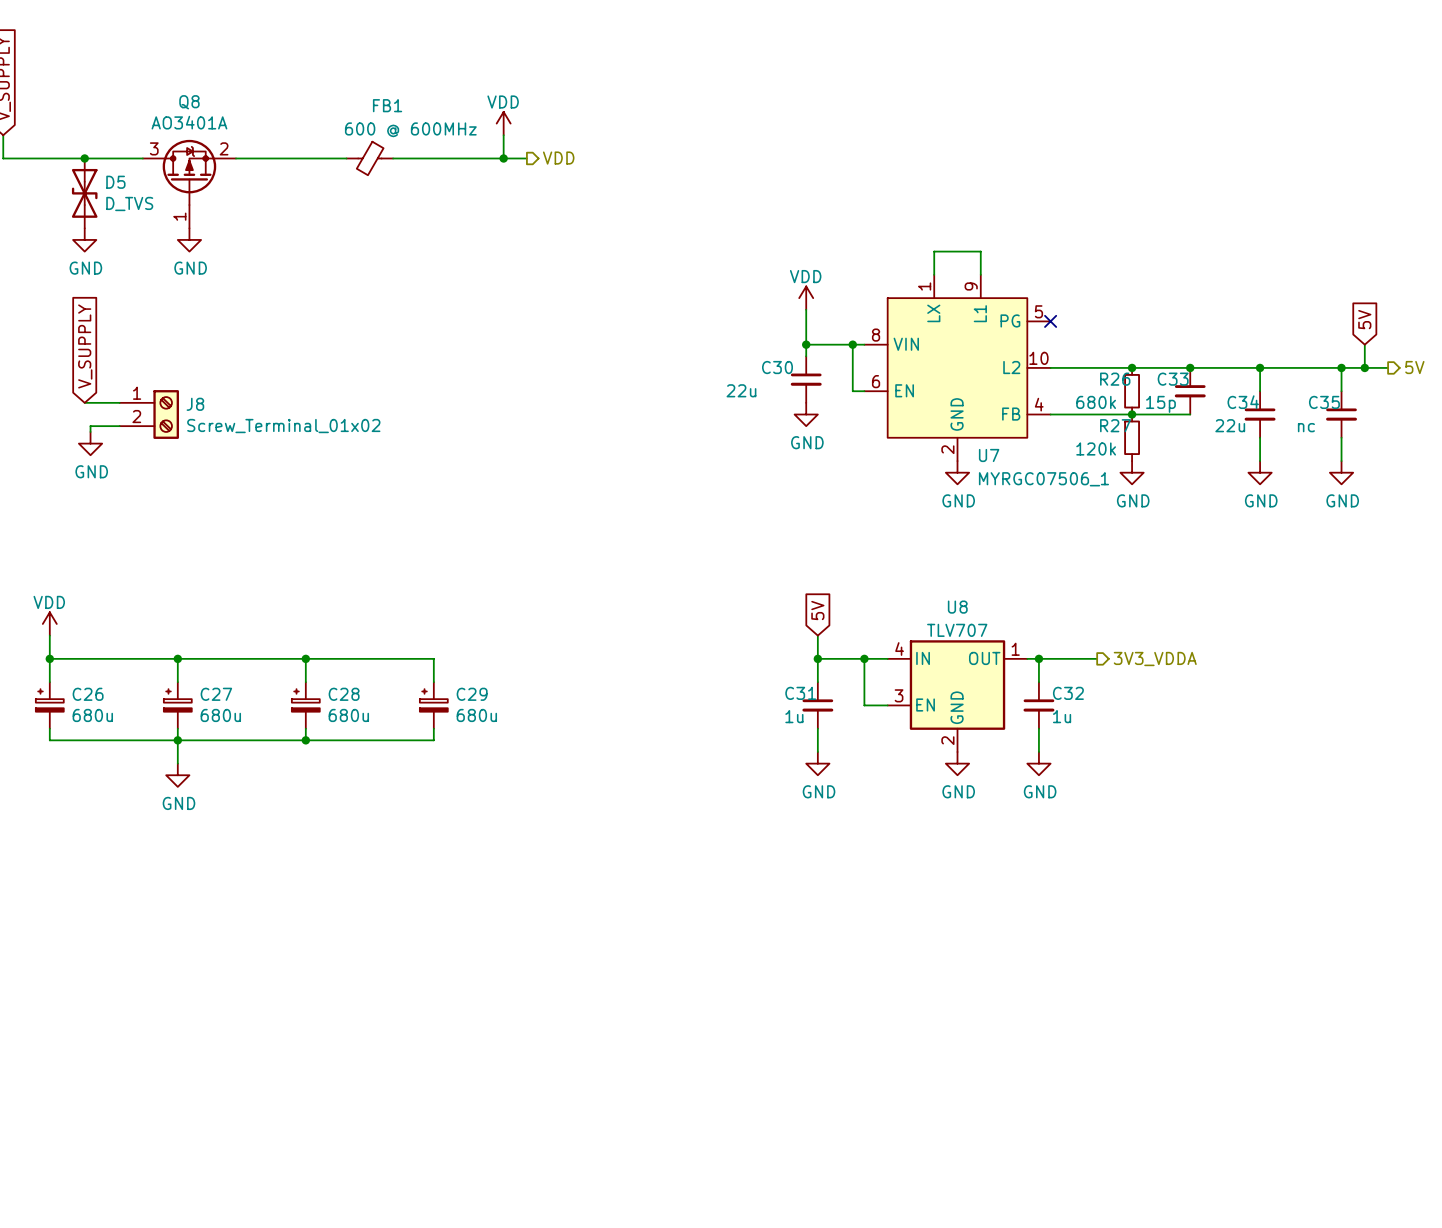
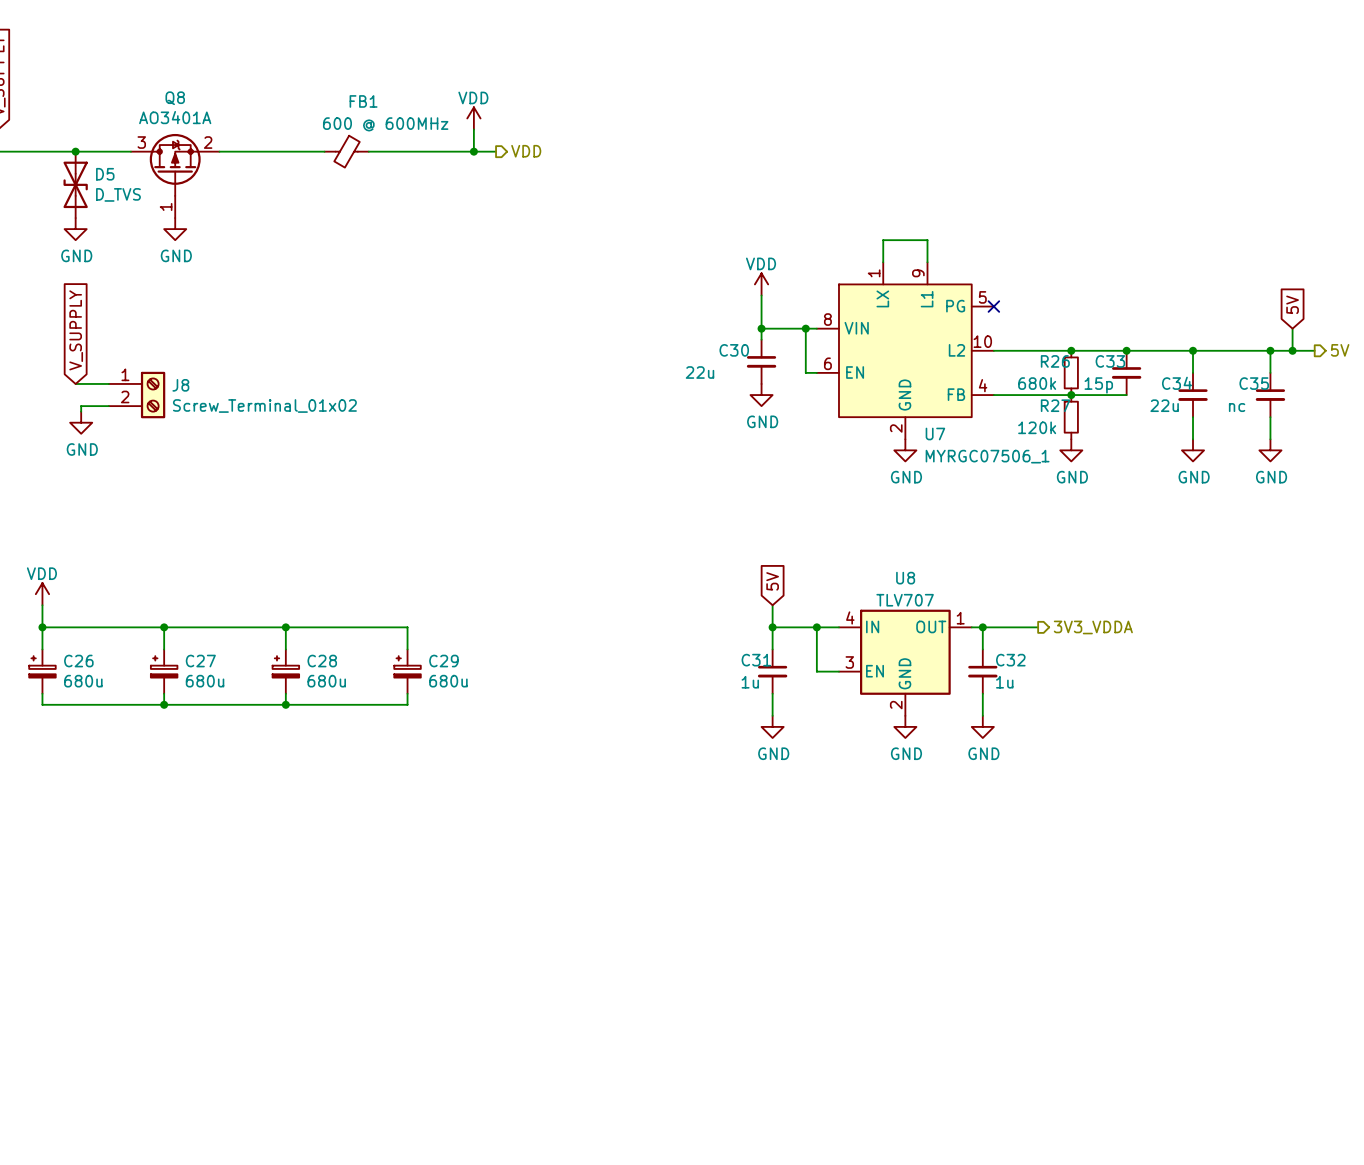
wire: (177, 740) (177, 763) -> none
power symbol: GND (177, 775) -> none

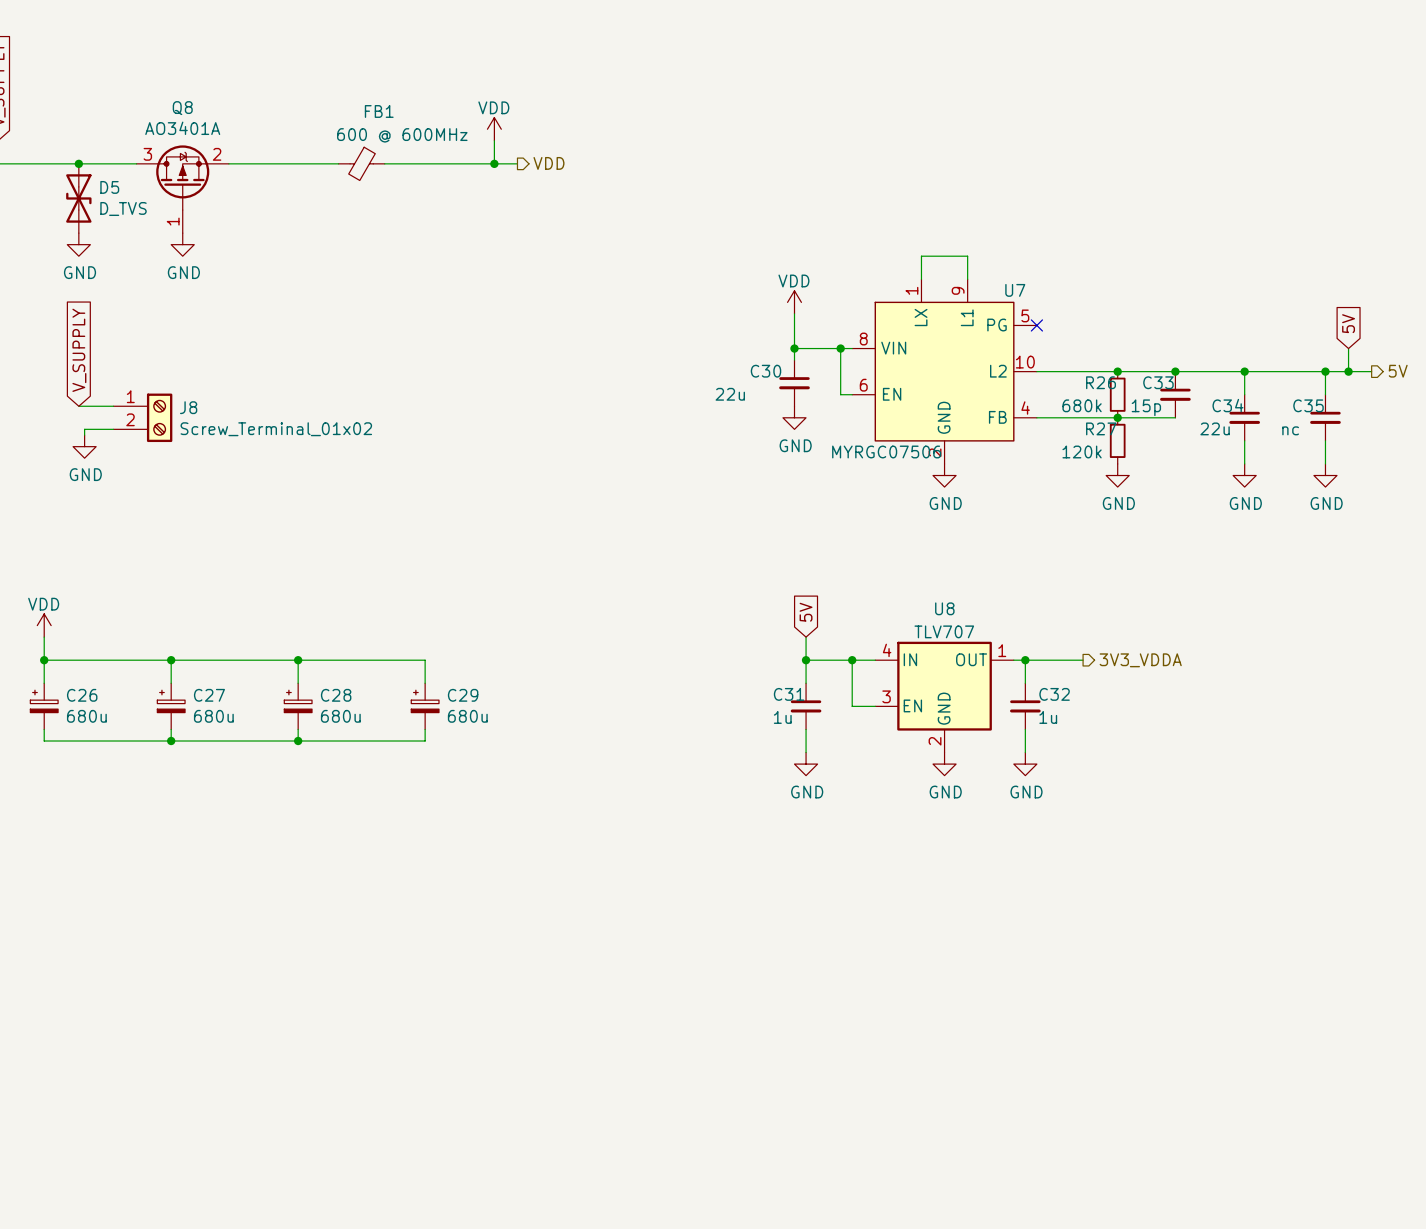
U7 name position: U7 (935, 434) -> U7 (1015, 290)
U7 value: MYRGC07506_1 (987, 456) -> MYRGC07506 (886, 451)

